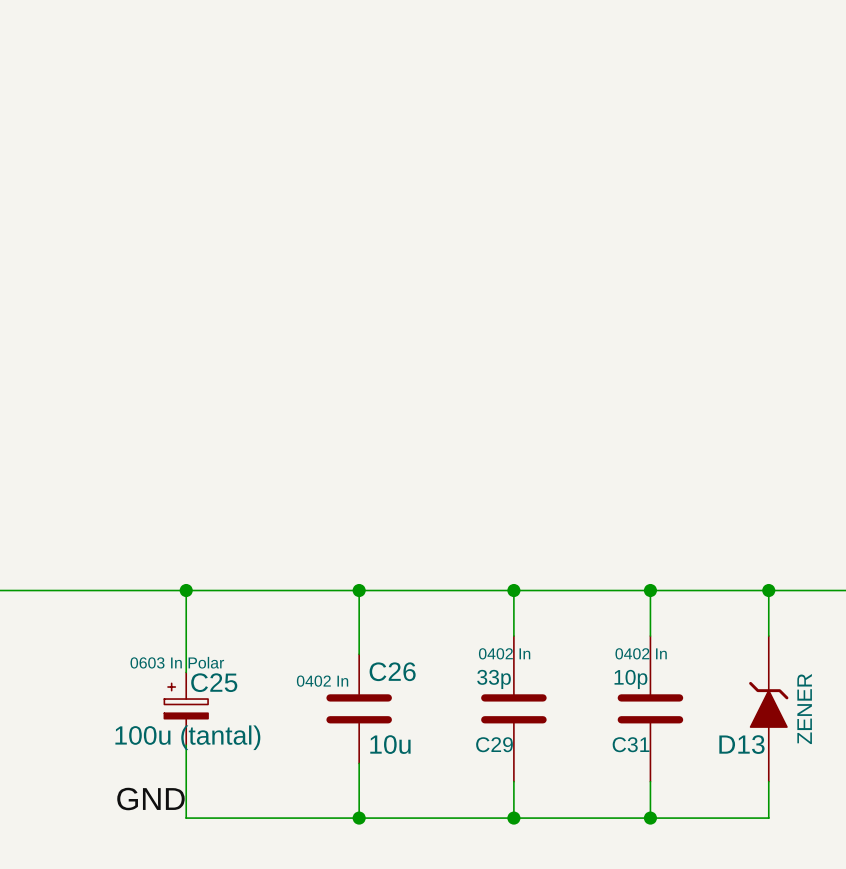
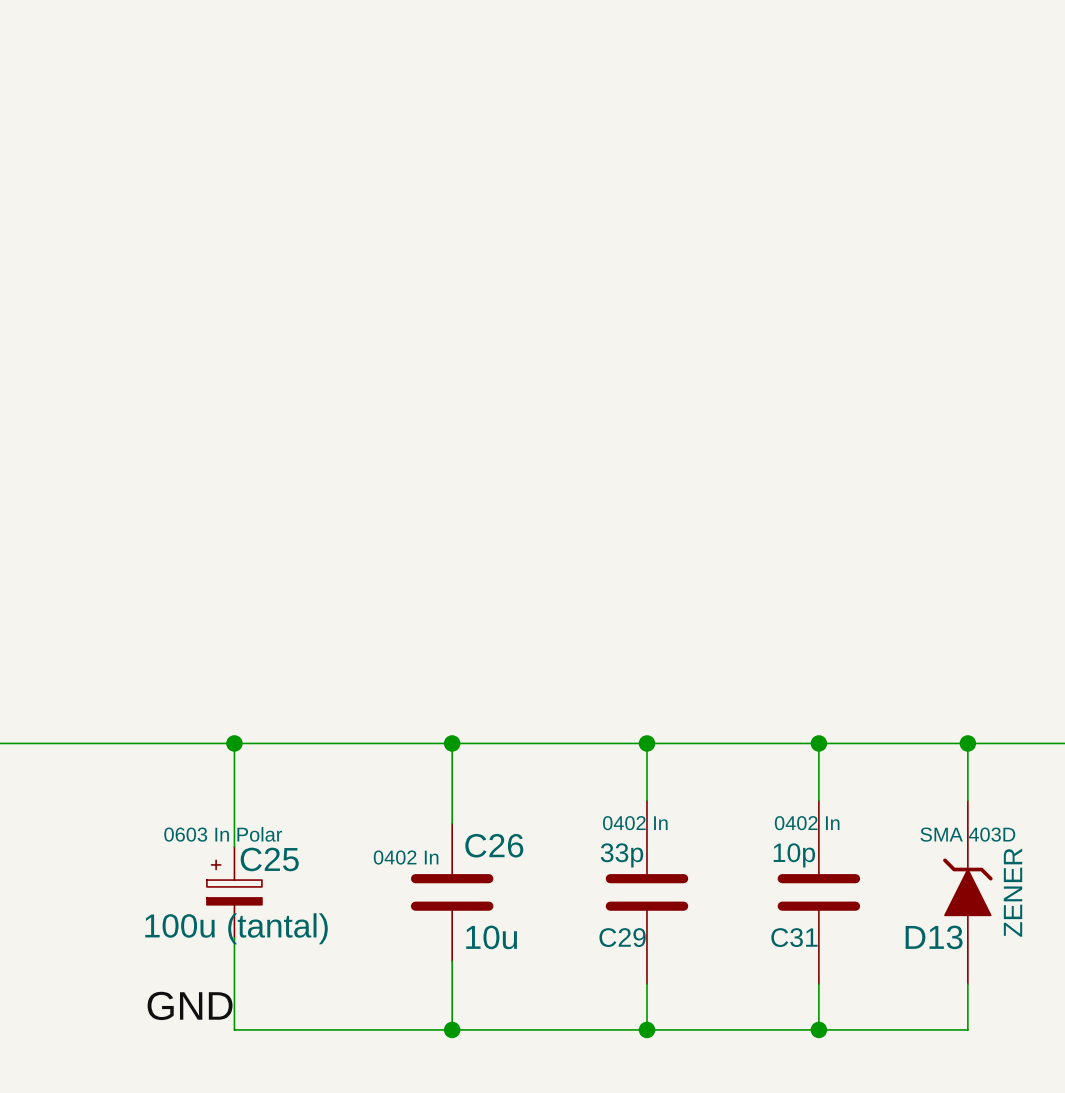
D13 text: none -> SMA 403D (967, 834)

